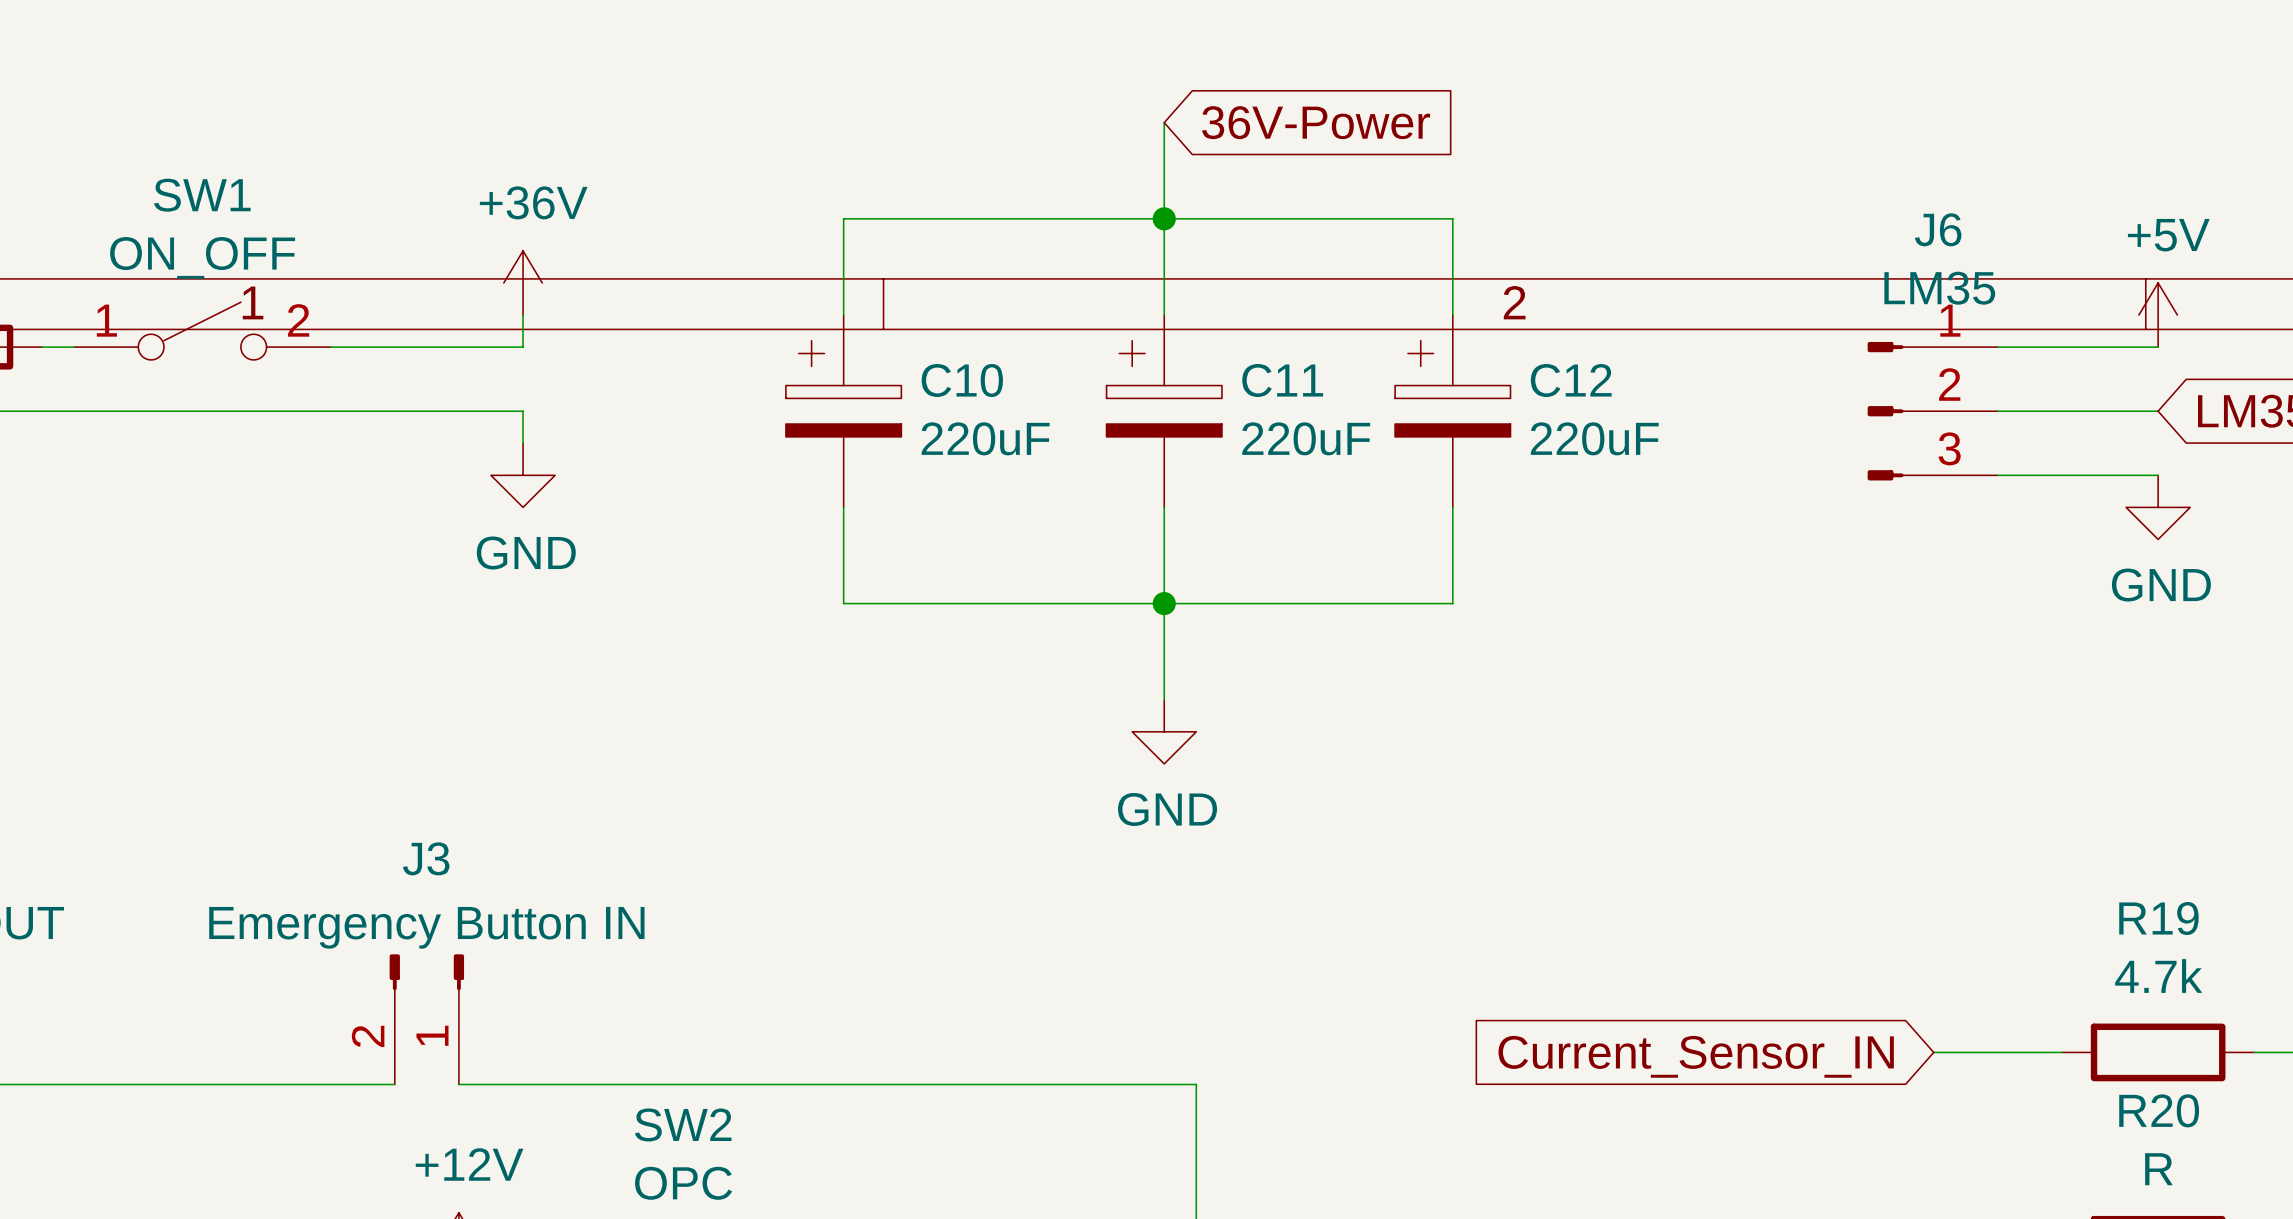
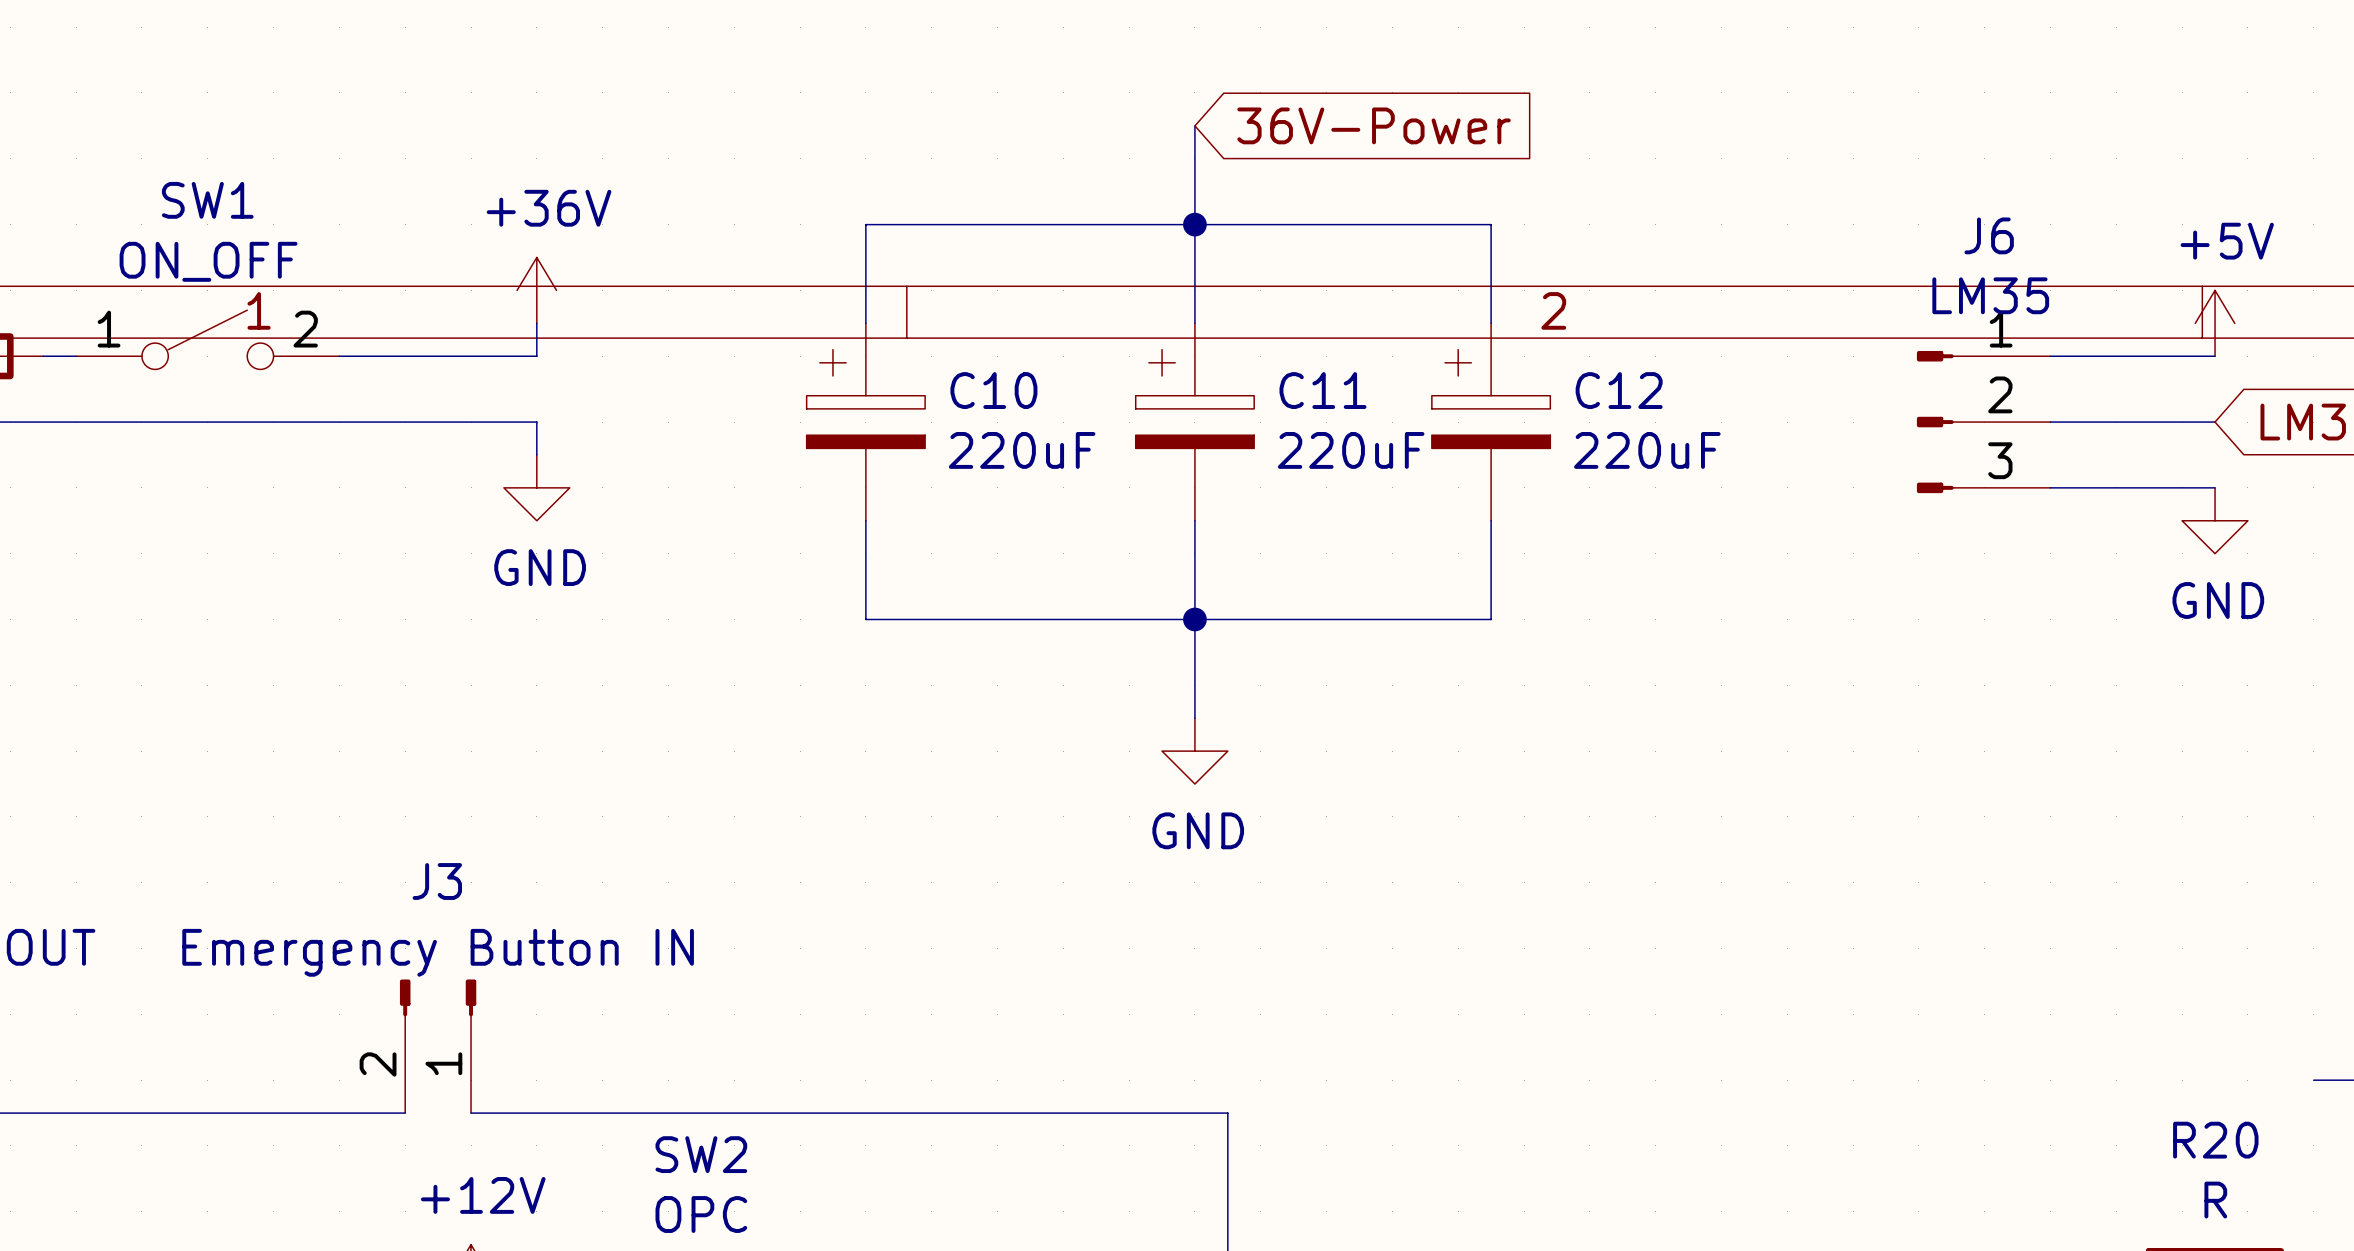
wire: (1933, 1052) (2061, 1052) -> none
R19: 4.7k (2158, 1052) -> none
global label: Current_Sensor_IN (1696, 1056) -> none

